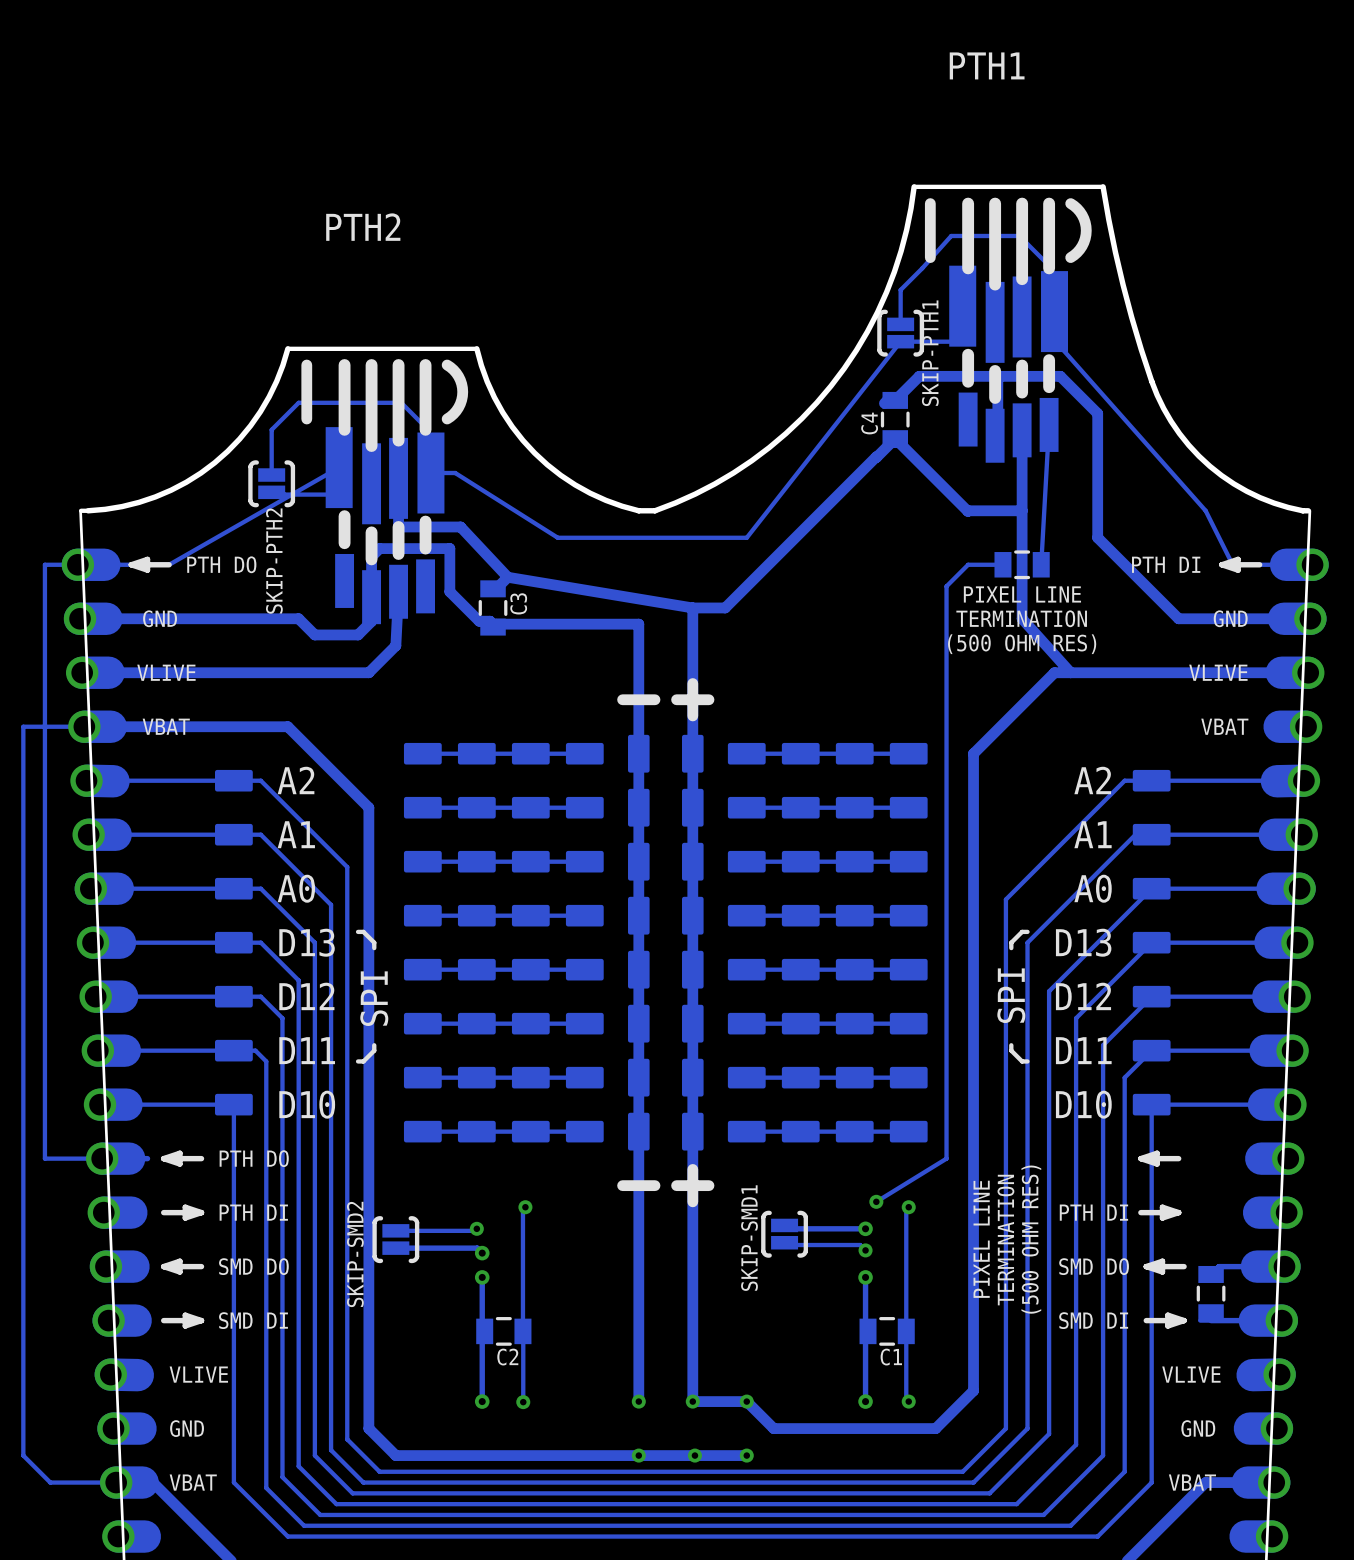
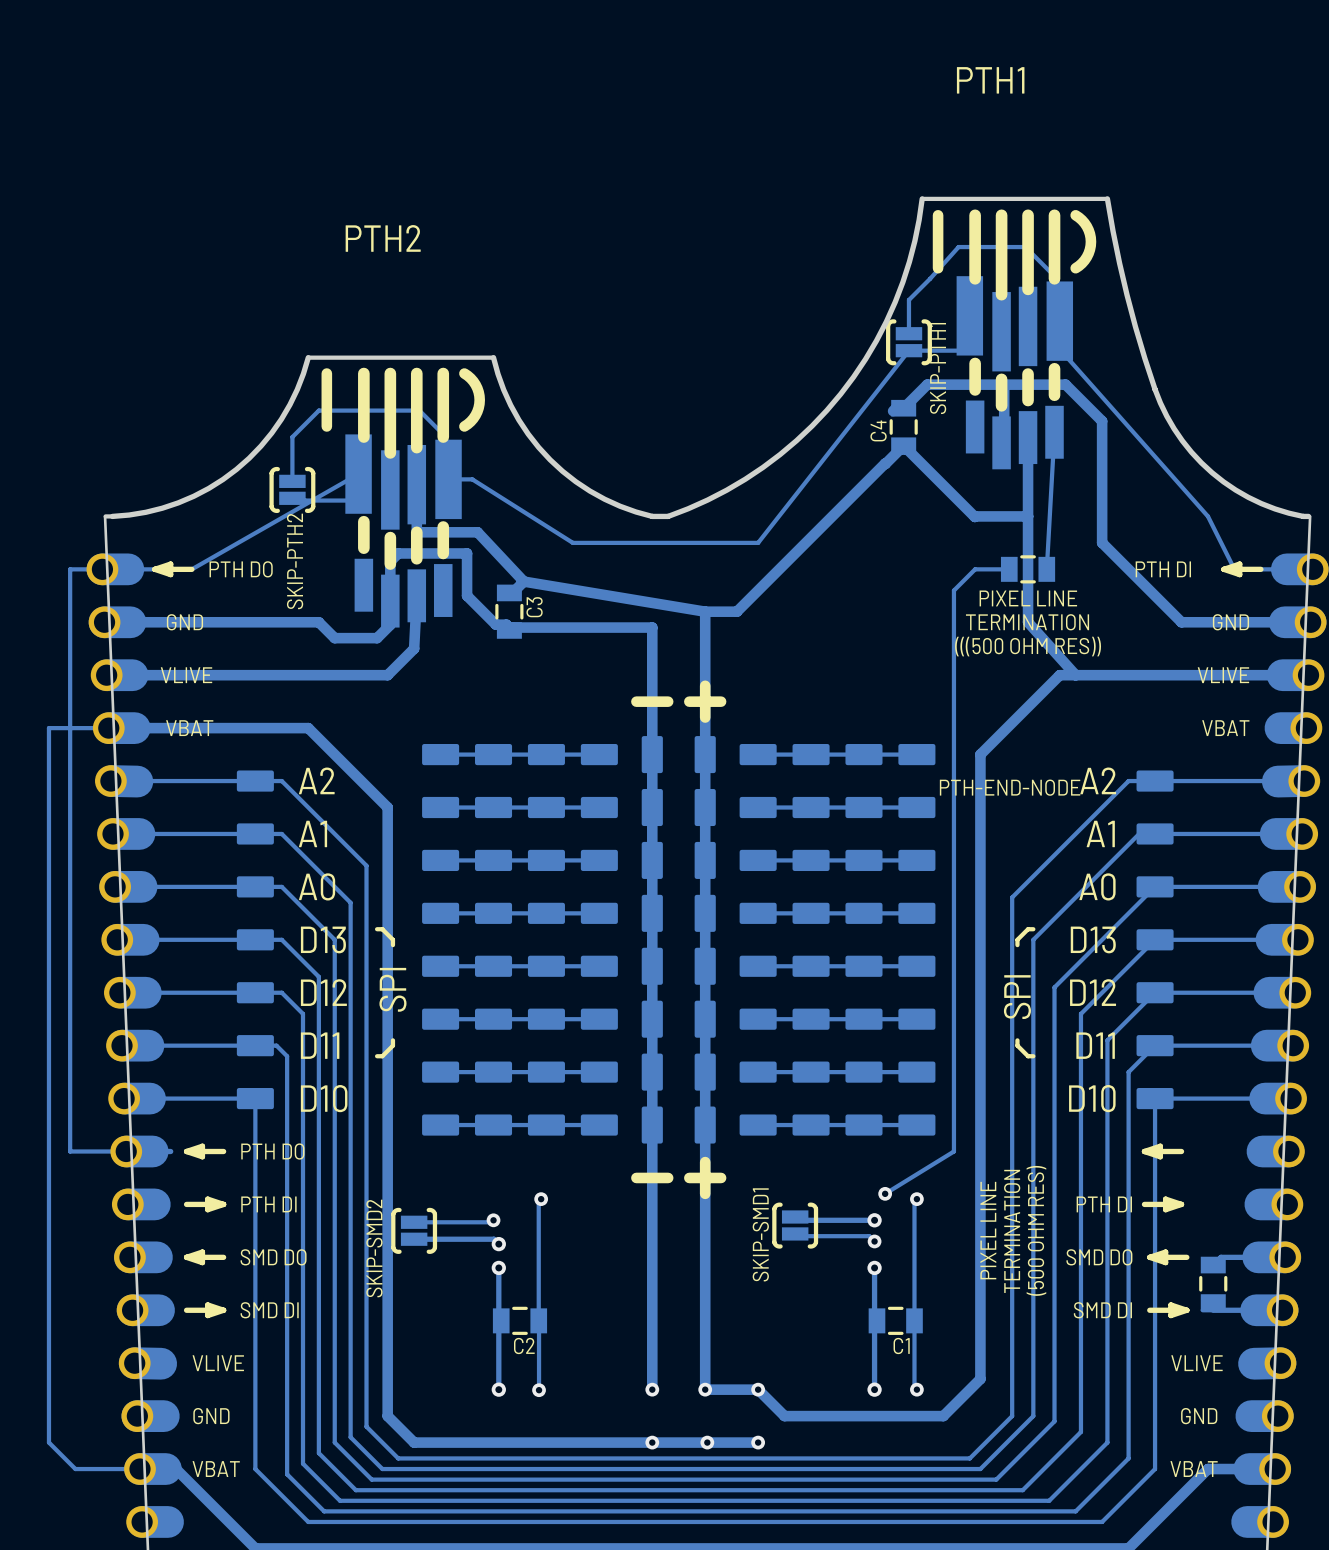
text: (500 OHM RES) (1022, 644) -> (((500 OHM RES)) (1028, 646)
PTH-END-NODE name: none -> PTH-END-NODE (1010, 787)

